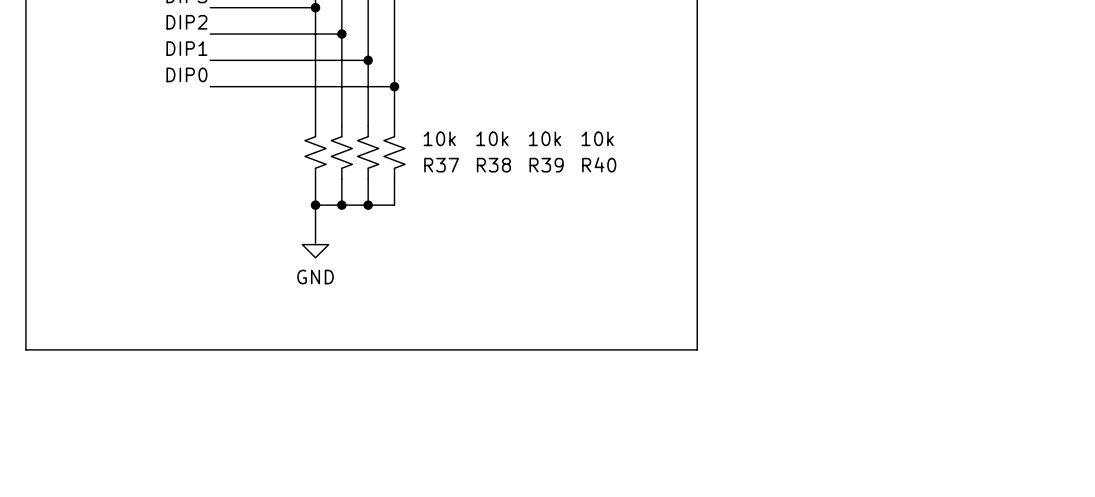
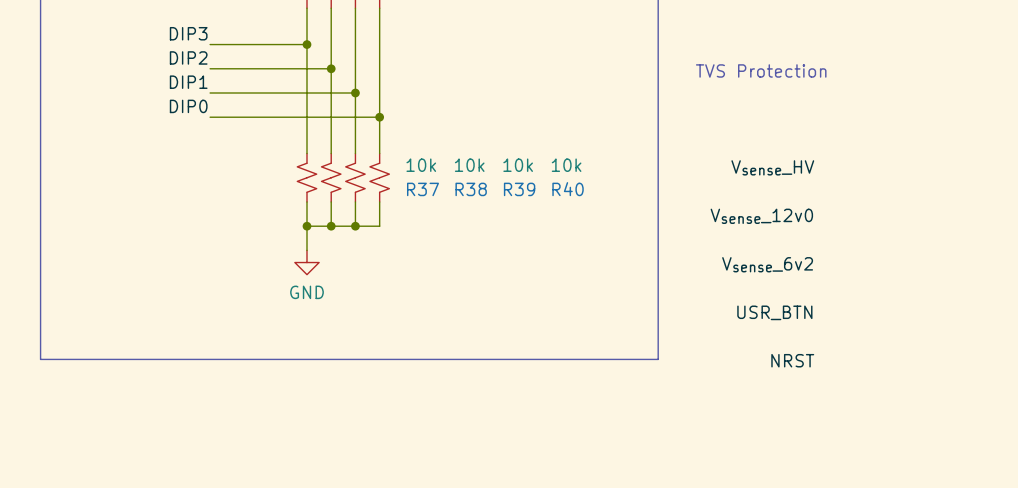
text: none -> TVS Protection (761, 70)
label: none -> Vsense_HV (772, 167)
label: none -> Vsense_12v0 (761, 216)
label: none -> Vsense_6v2 (767, 264)
label: none -> USR_BTN (774, 312)
label: none -> NRST (792, 360)

